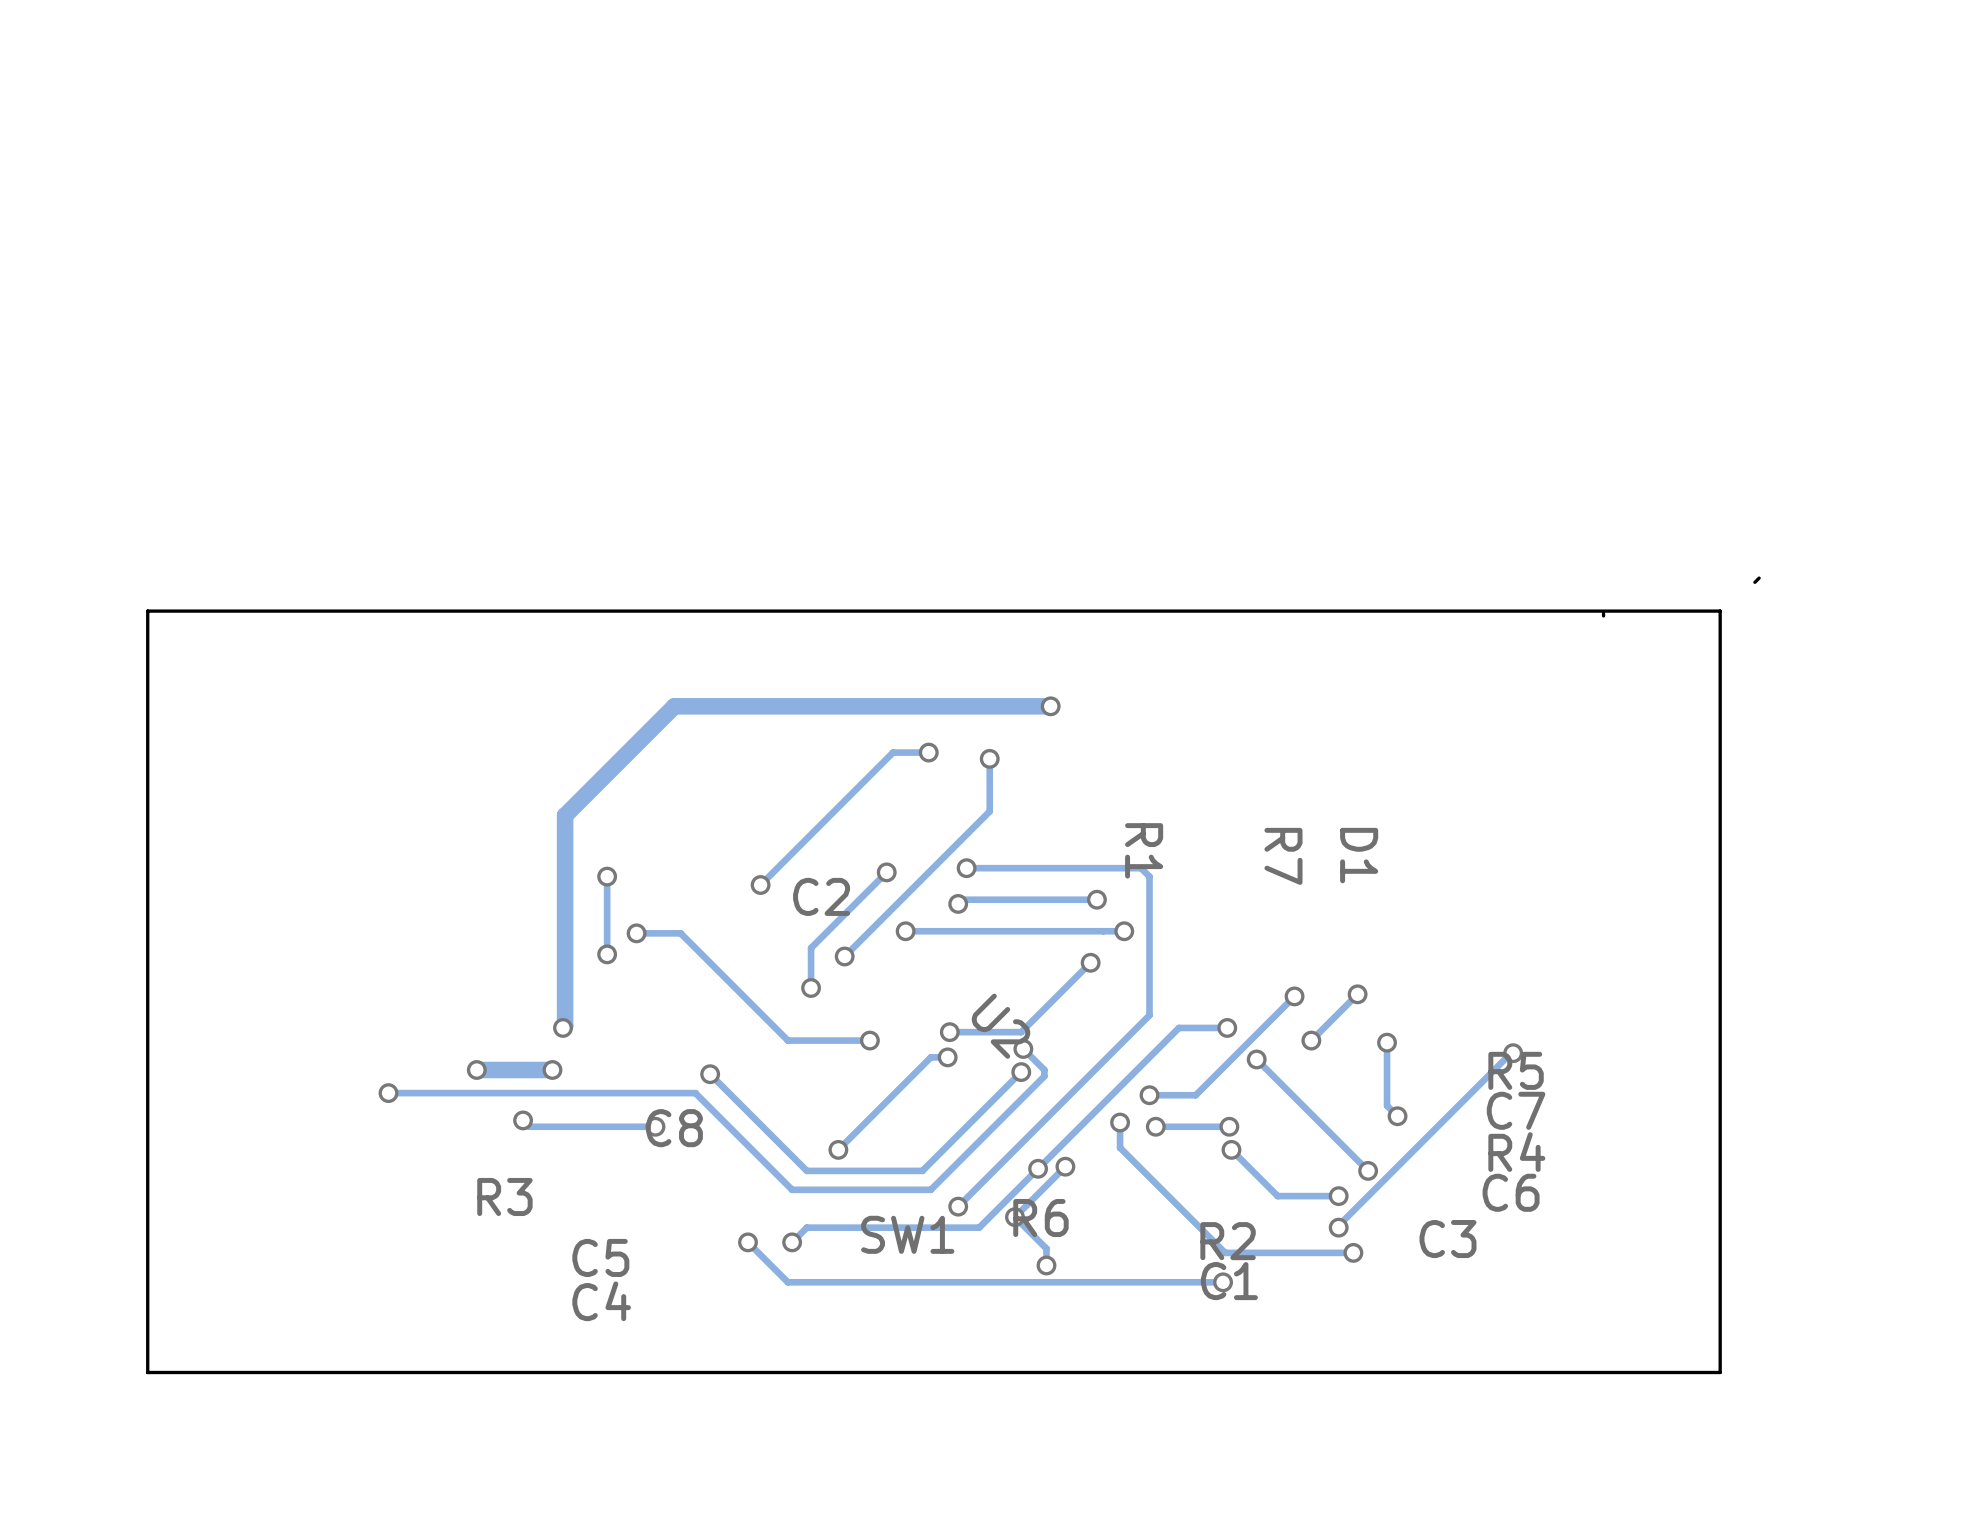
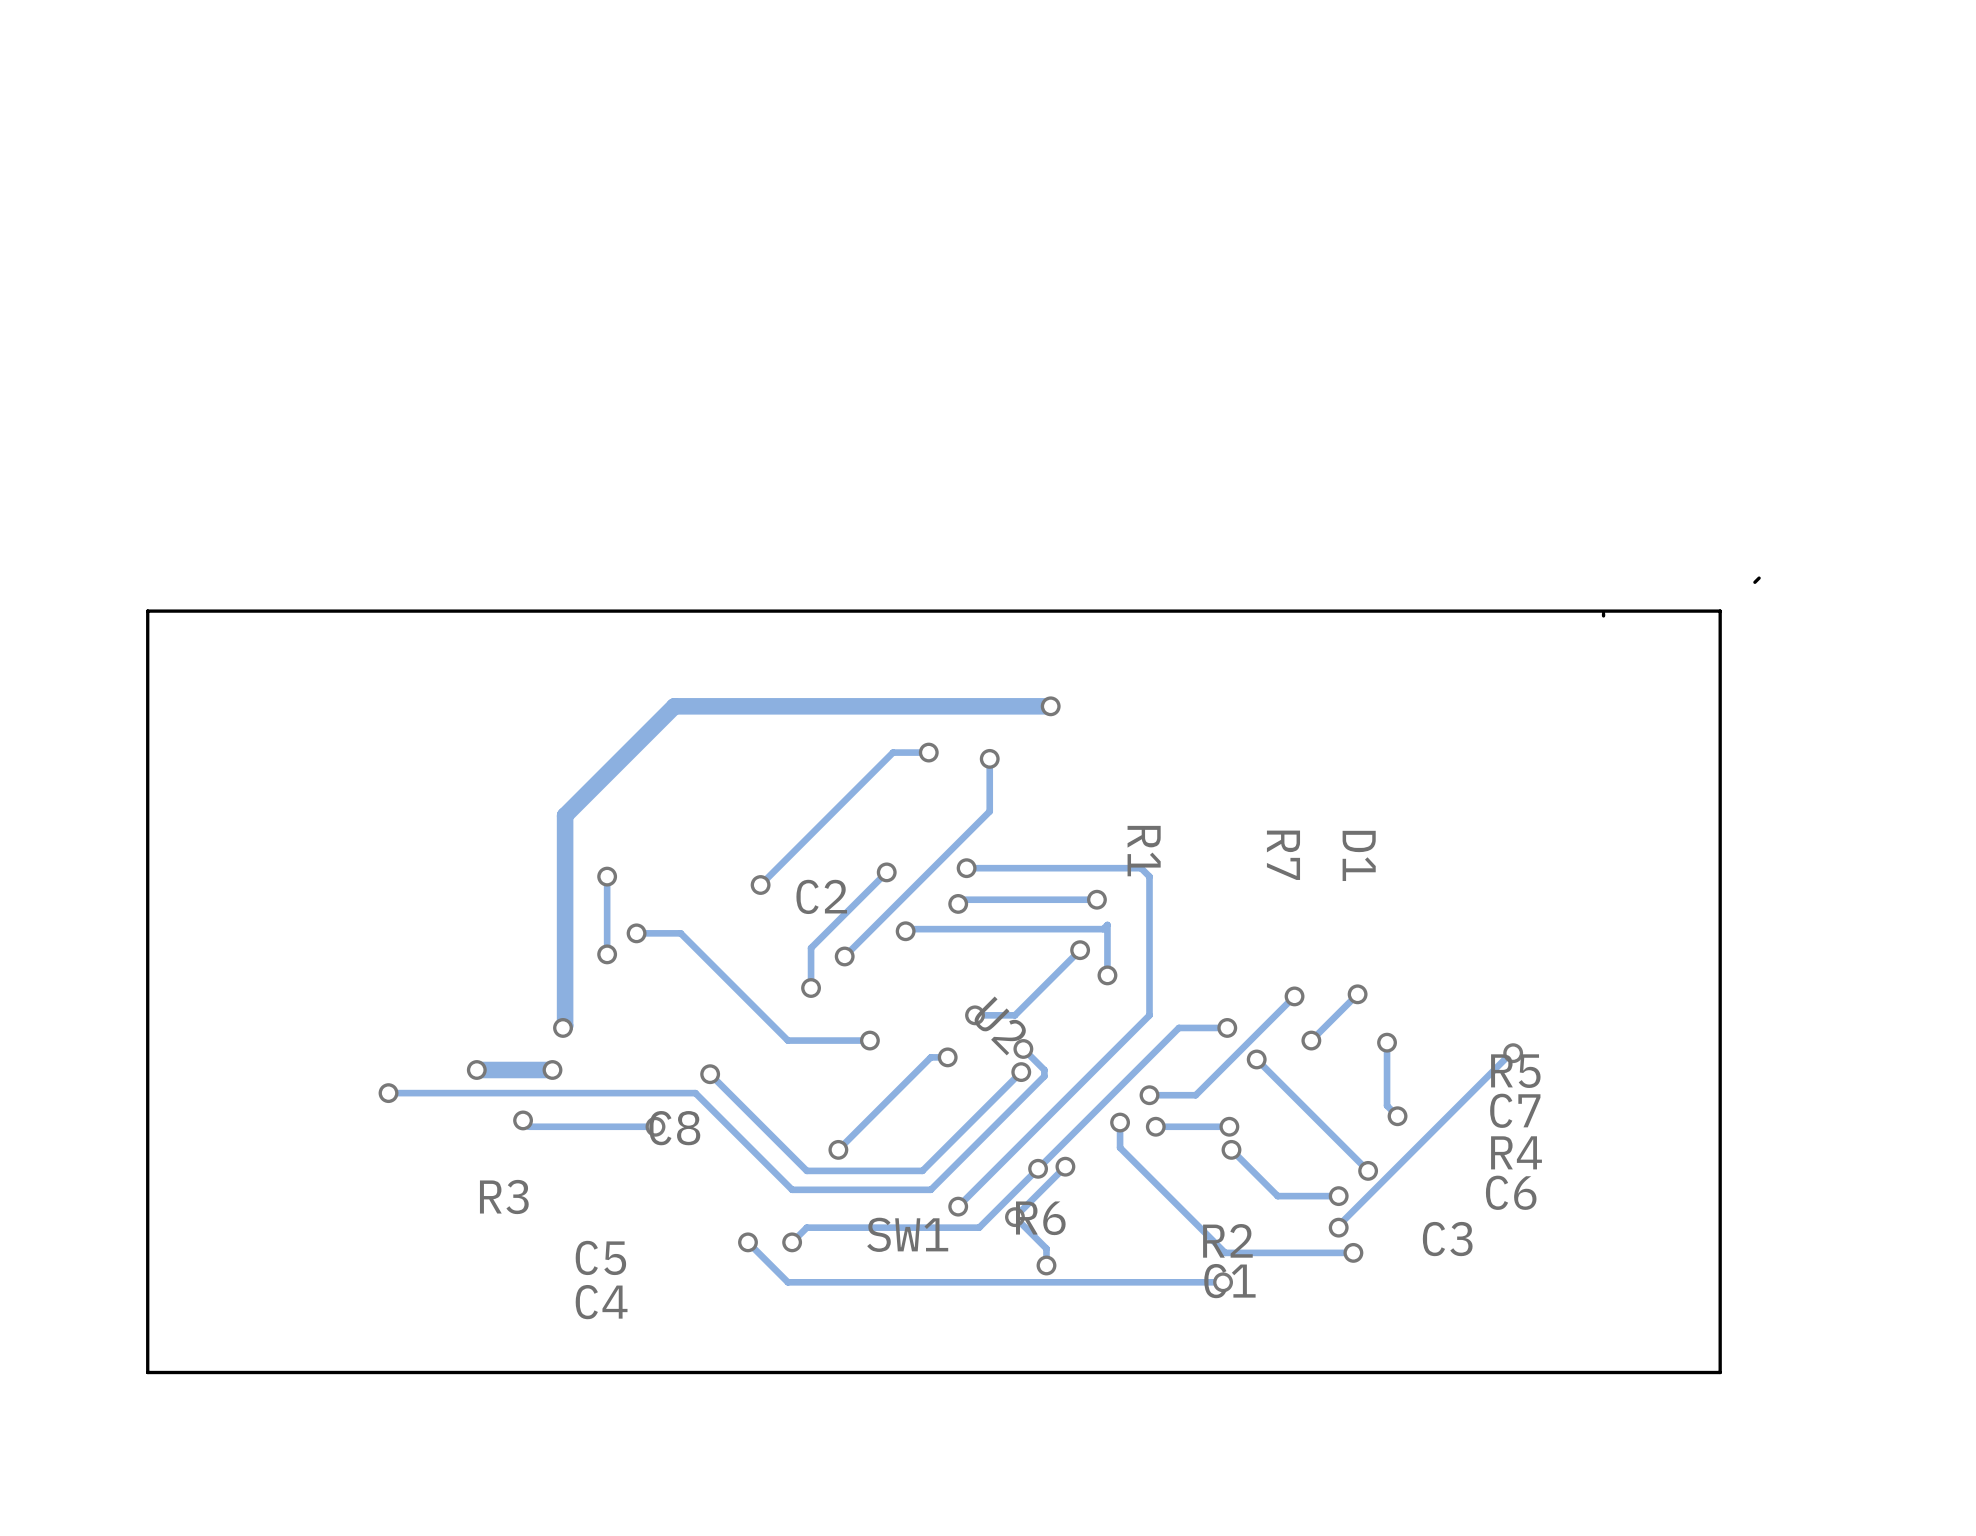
track: none -> (905, 929) (1103, 929) (1107, 924) (1107, 975)
track: (1124, 931) (905, 931) -> none
via: (1124, 931) -> none
track: none -> (1080, 950) (1014, 1015) (975, 1015)
via: none -> (1080, 950)
track: (1090, 962) (1021, 1032) (949, 1032) -> none
via: (1090, 962) -> none
via: none -> (1107, 975)
via position: (949, 1032) -> (975, 1015)

